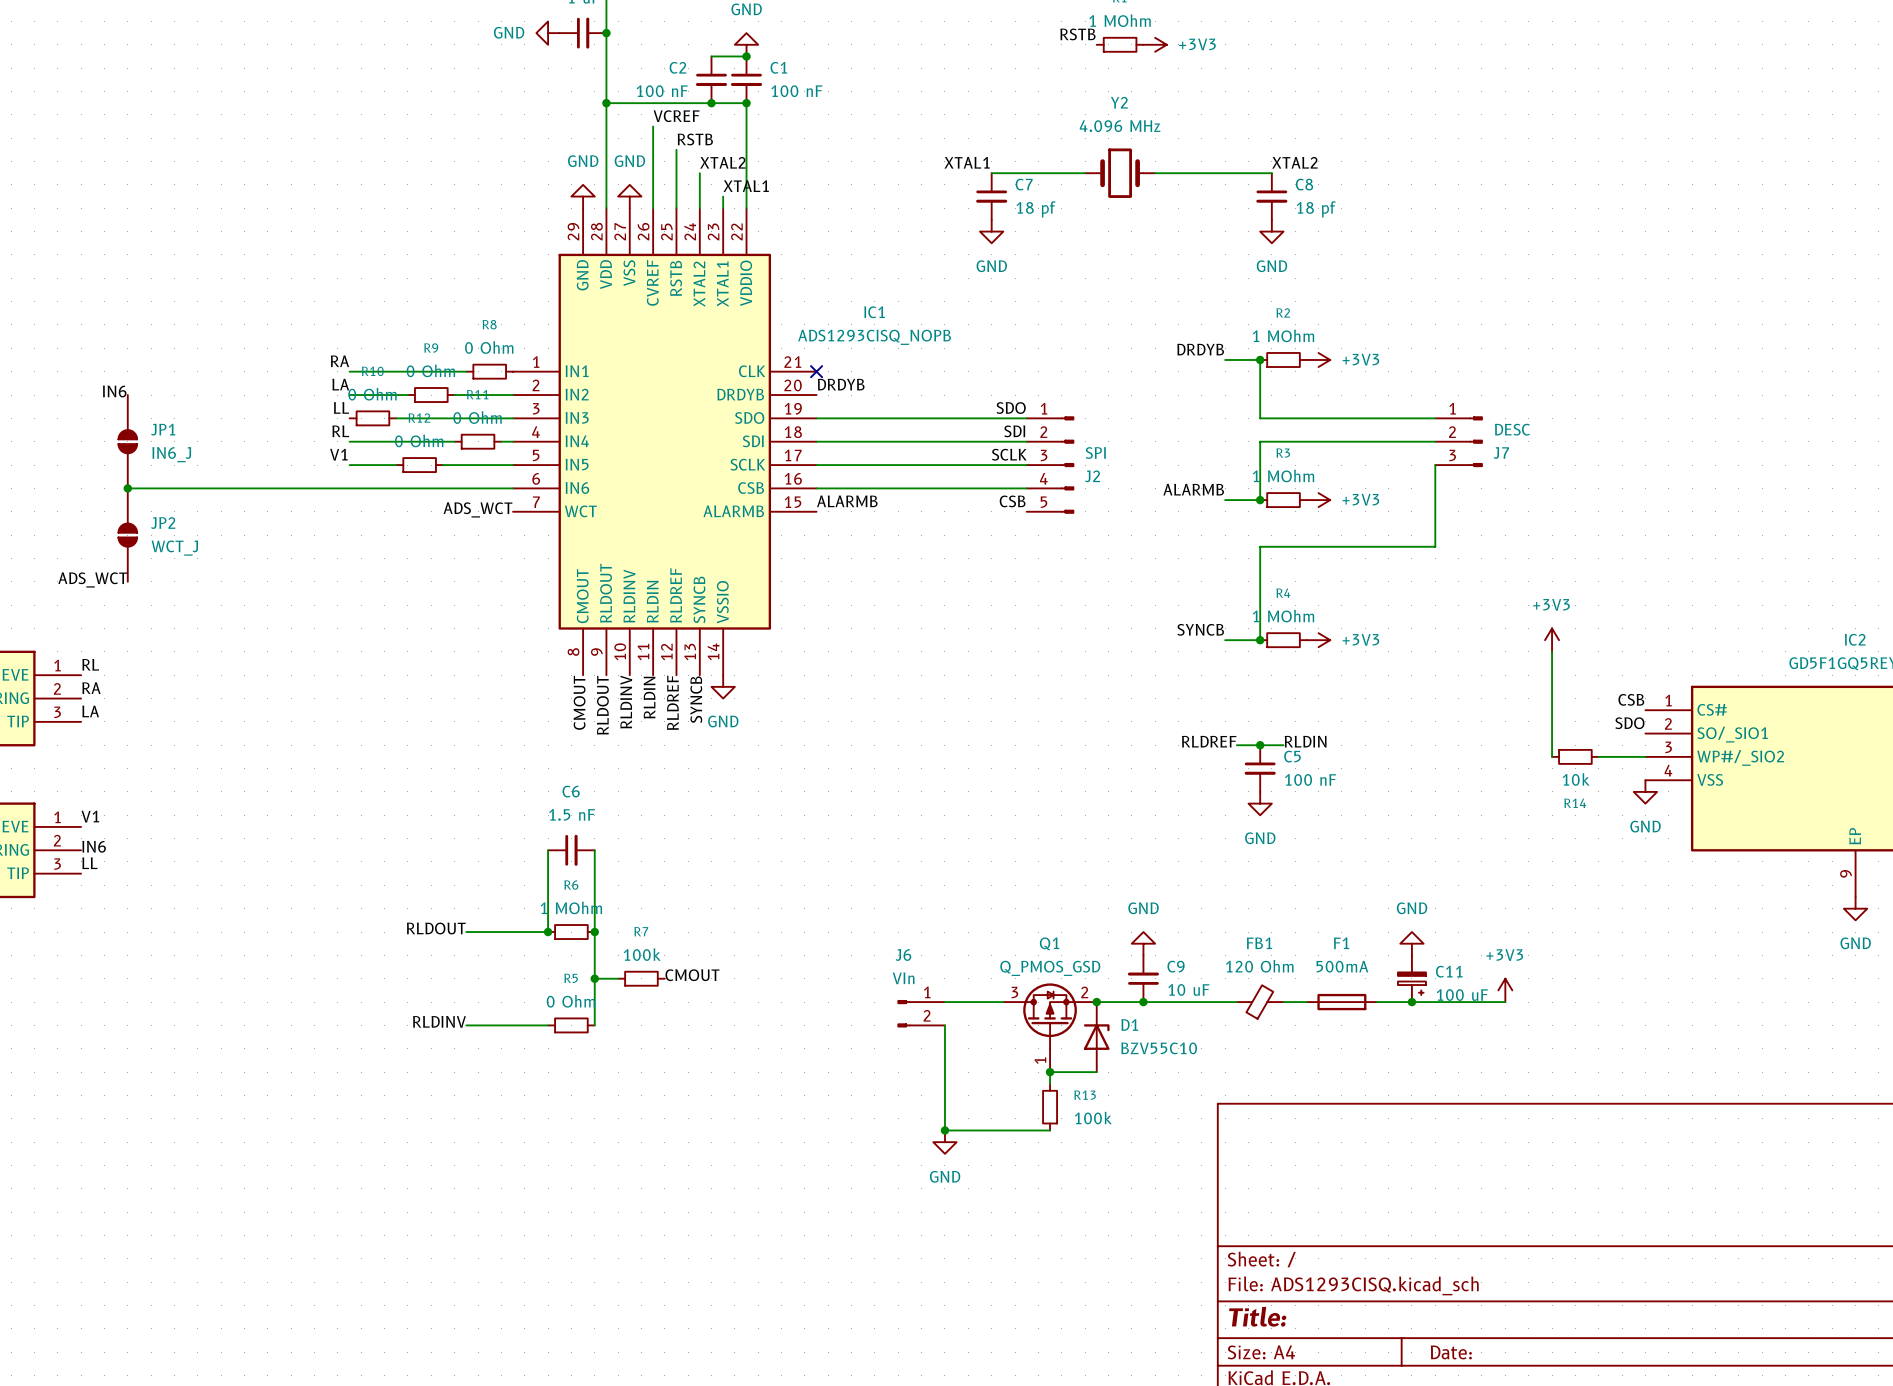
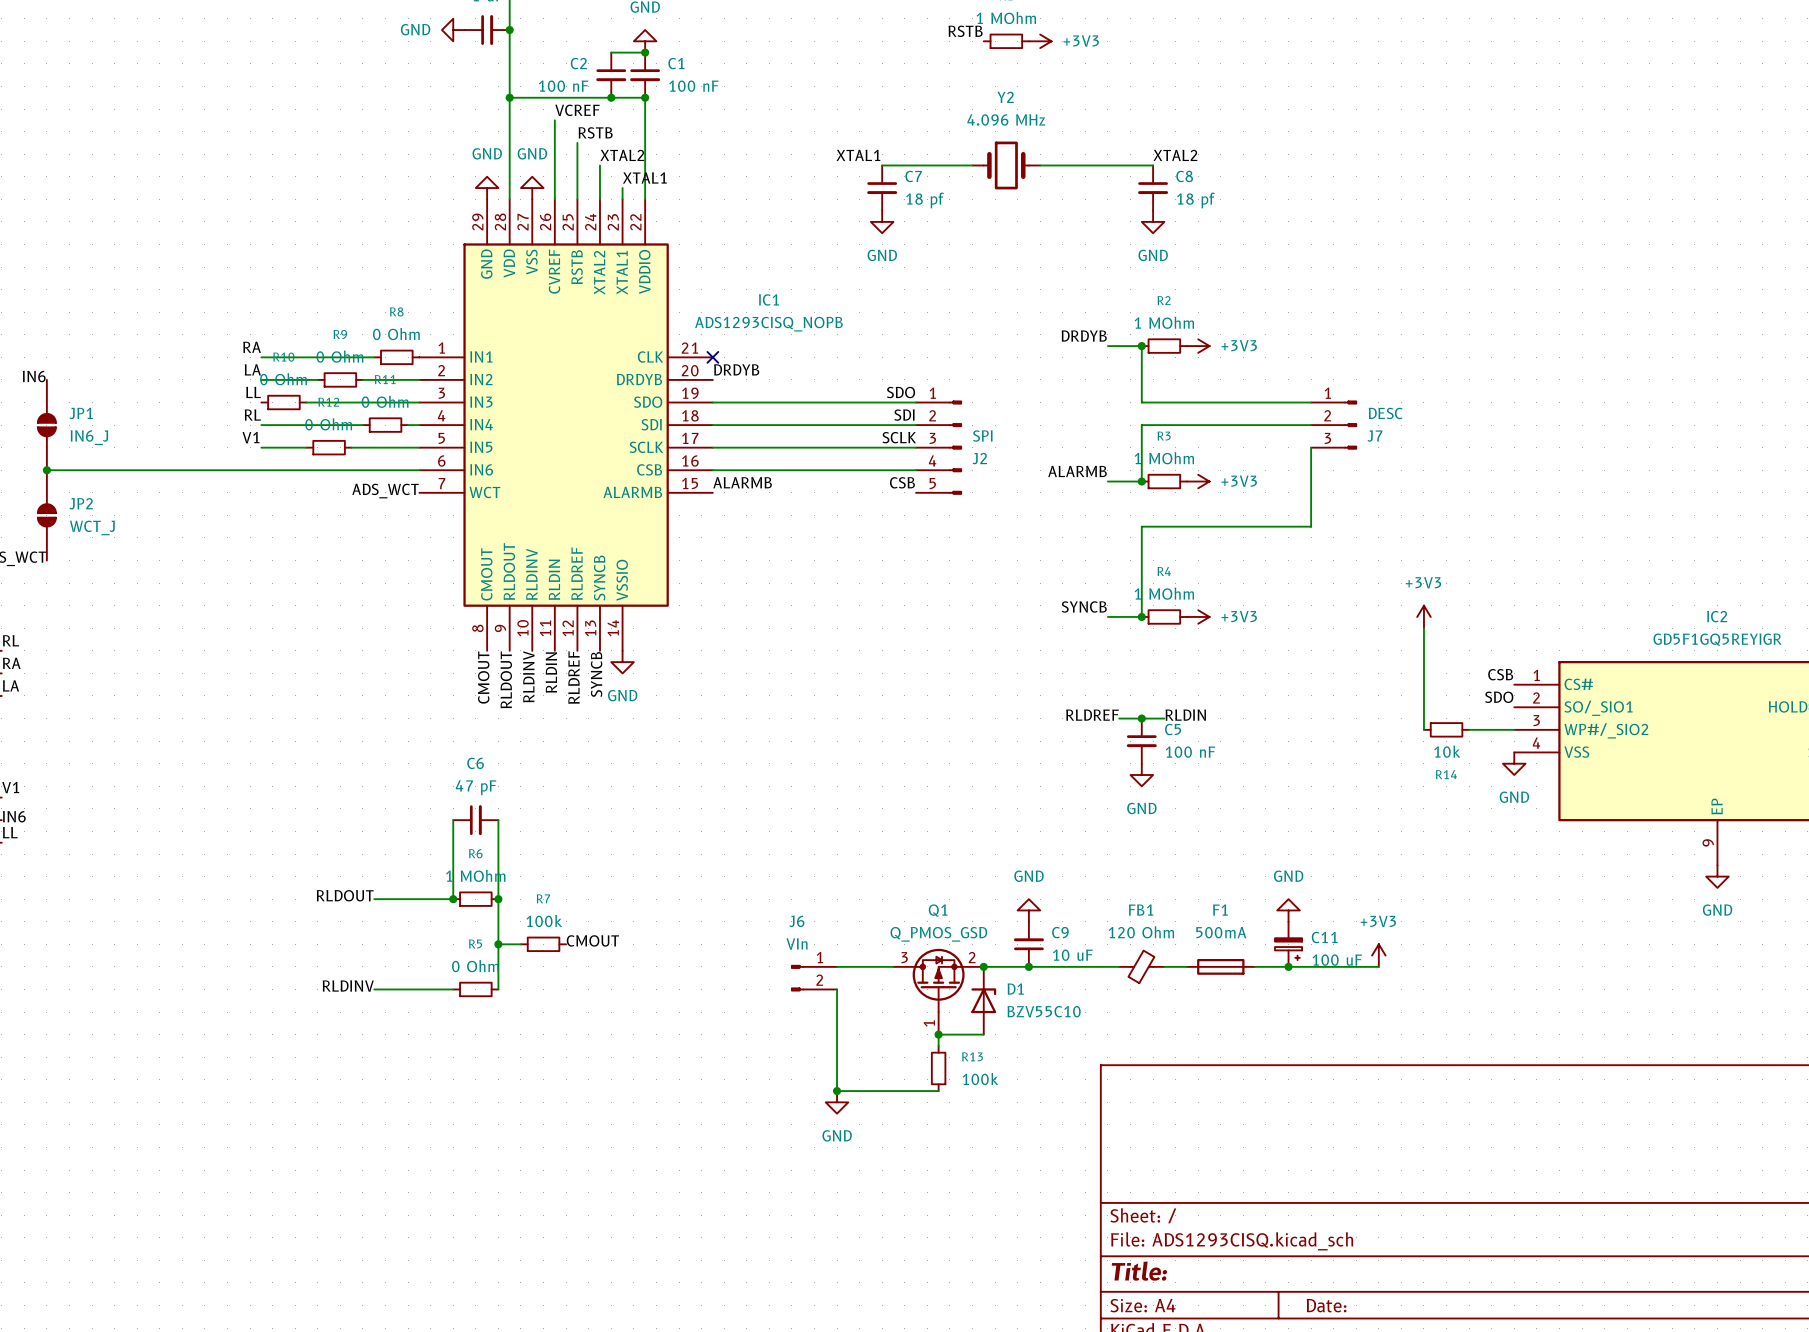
C6 value: 1.5 nF (572, 814) -> 47 pF (476, 787)

